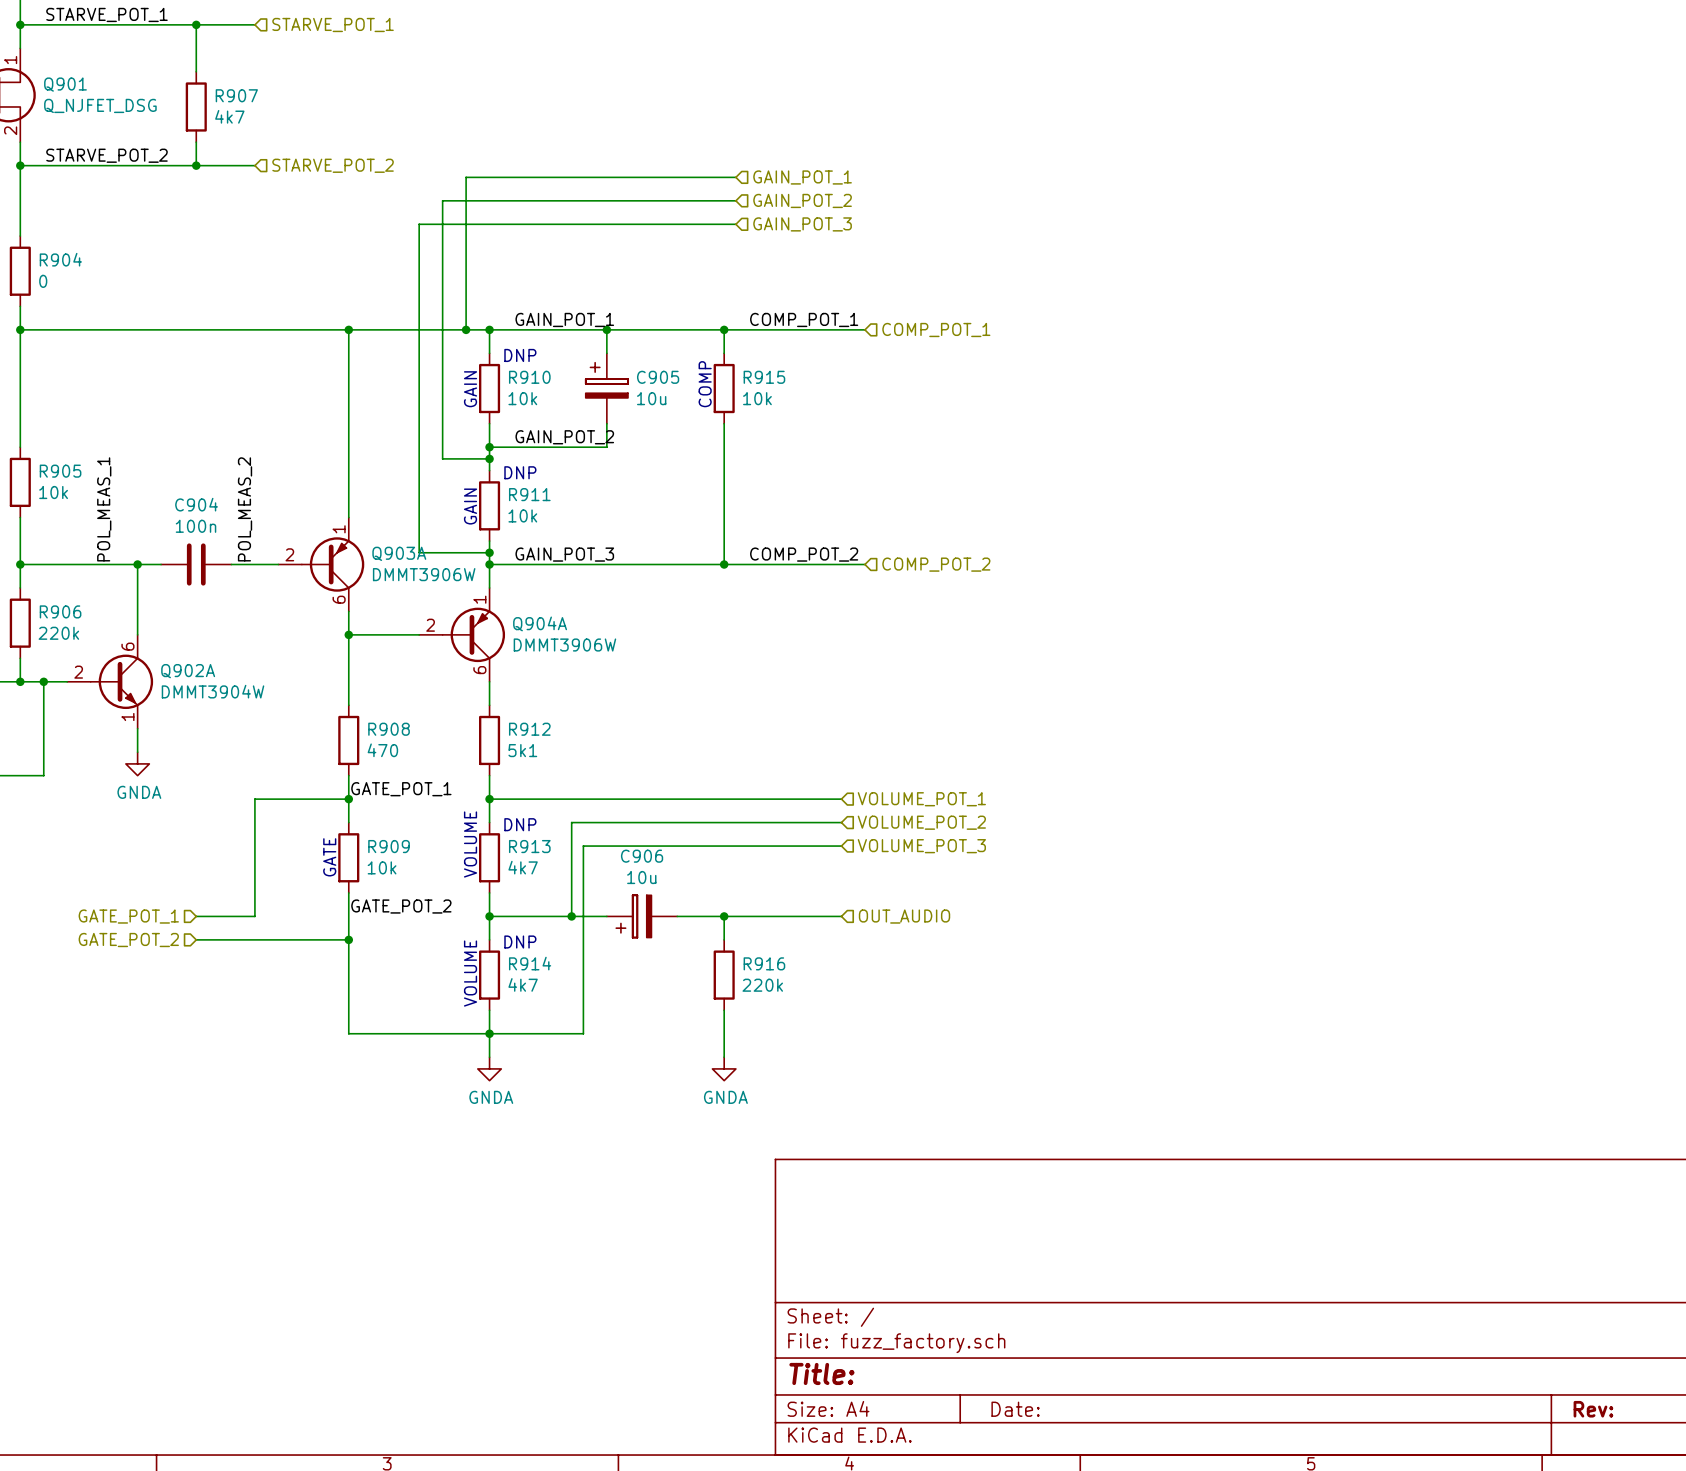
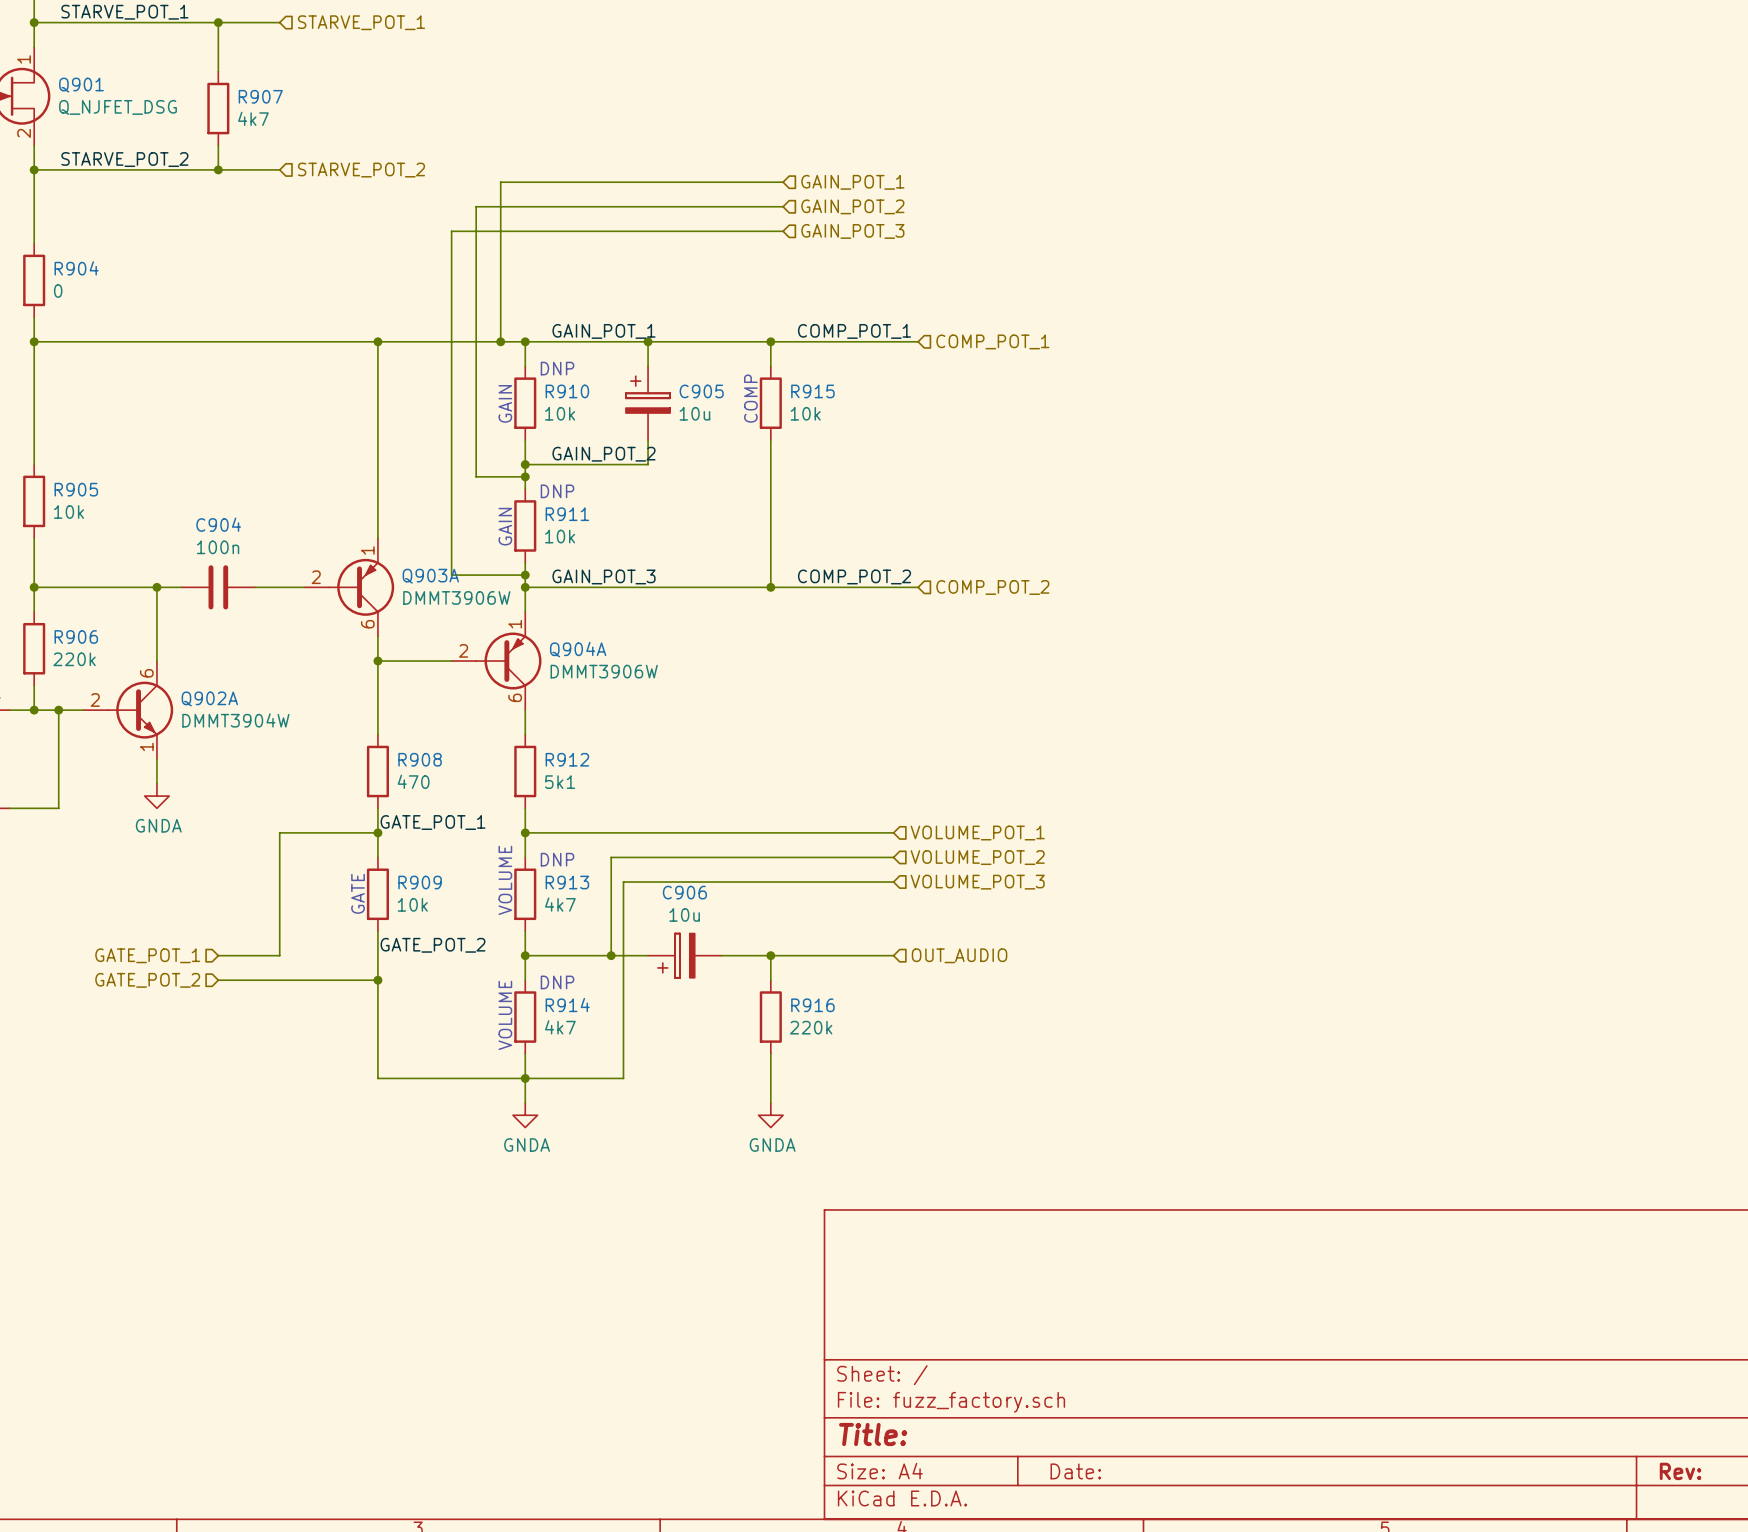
label: POL_MEAS_1 (104, 509) -> none
label: POL_MEAS_2 (245, 509) -> none

